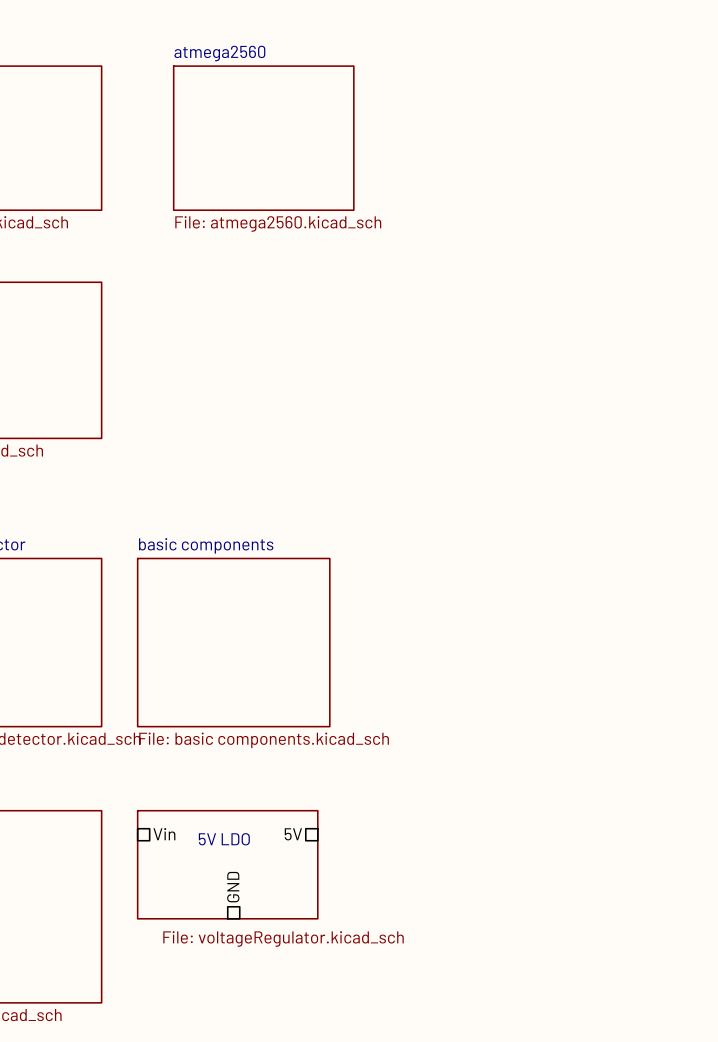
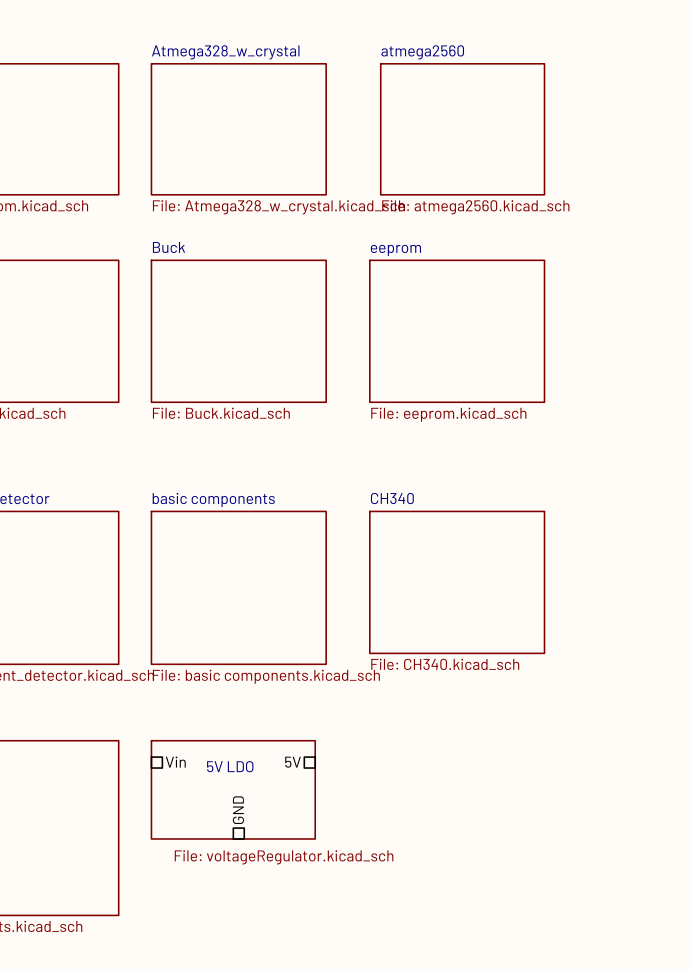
sheet Atmega328_w_crystal: none -> File: Atmega328_w_crystal.kicad_sch (238, 129)
sheet atmega2560 position: (263, 138) -> (462, 129)
sheet Buck: none -> File: Buck.kicad_sch (238, 331)
sheet eeprom: none -> File: eeprom.kicad_sch (457, 331)
sheet CH340: none -> File: CH340.kicad_sch (457, 582)

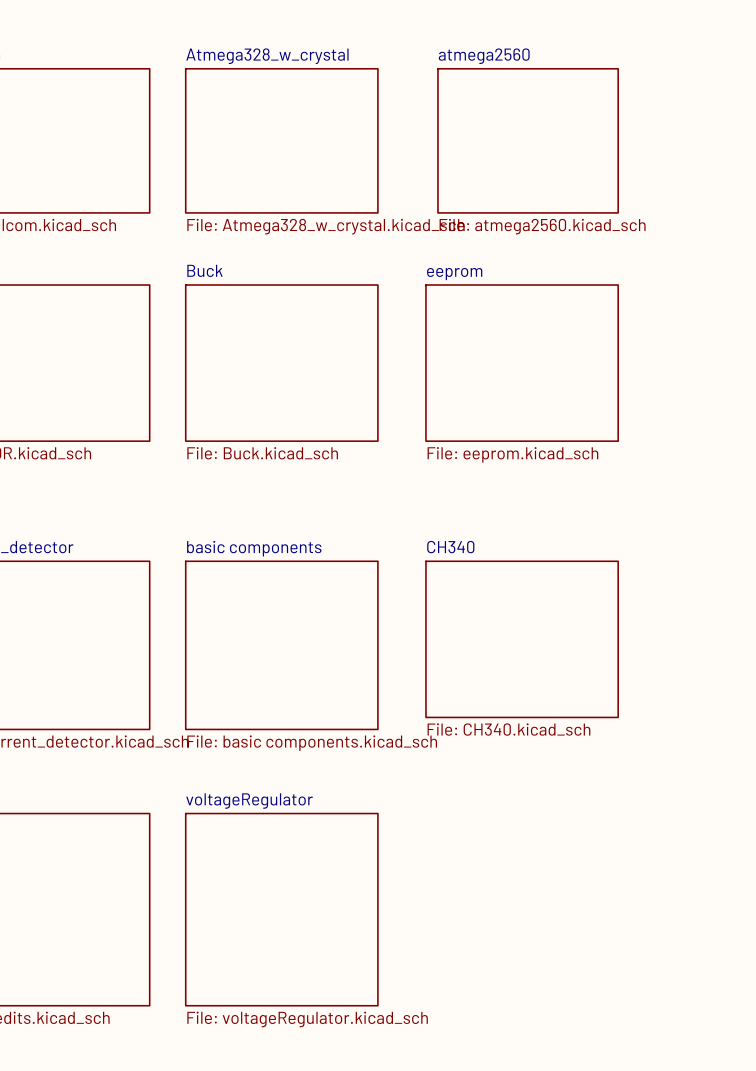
sheet pin: Vin (175, 762) -> none
sheet pin: 5V (293, 762) -> none
sheet 5V LDO: File: voltageRegulator.kicad_sch (233, 789) -> none
sheet pin: GND (238, 810) -> none
sheet voltageRegulator: none -> File: voltageRegulator.kicad_sch (281, 909)

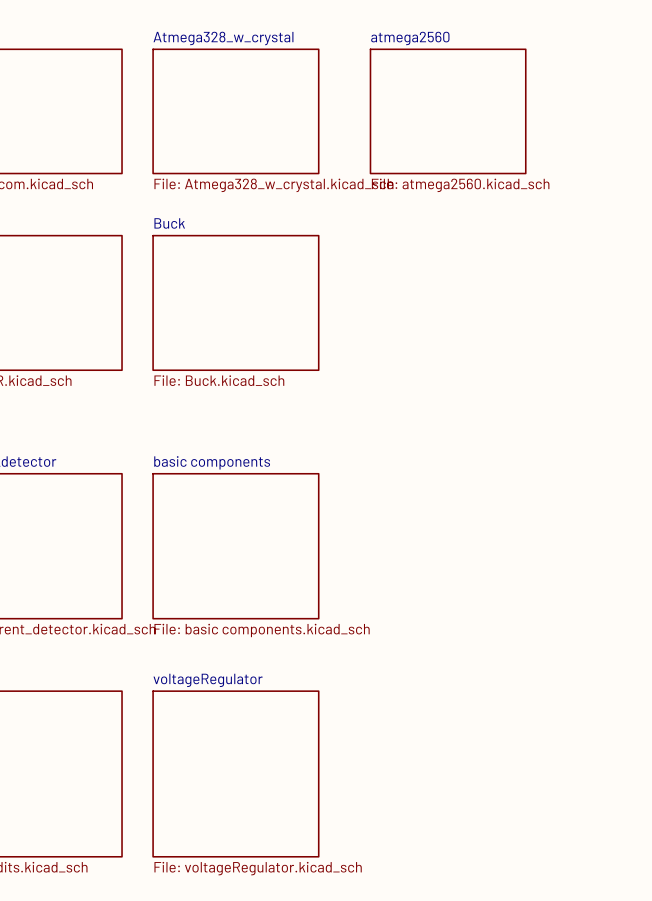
sheet eeprom: File: eeprom.kicad_sch (522, 363) -> none
sheet CH340: File: CH340.kicad_sch (522, 639) -> none

